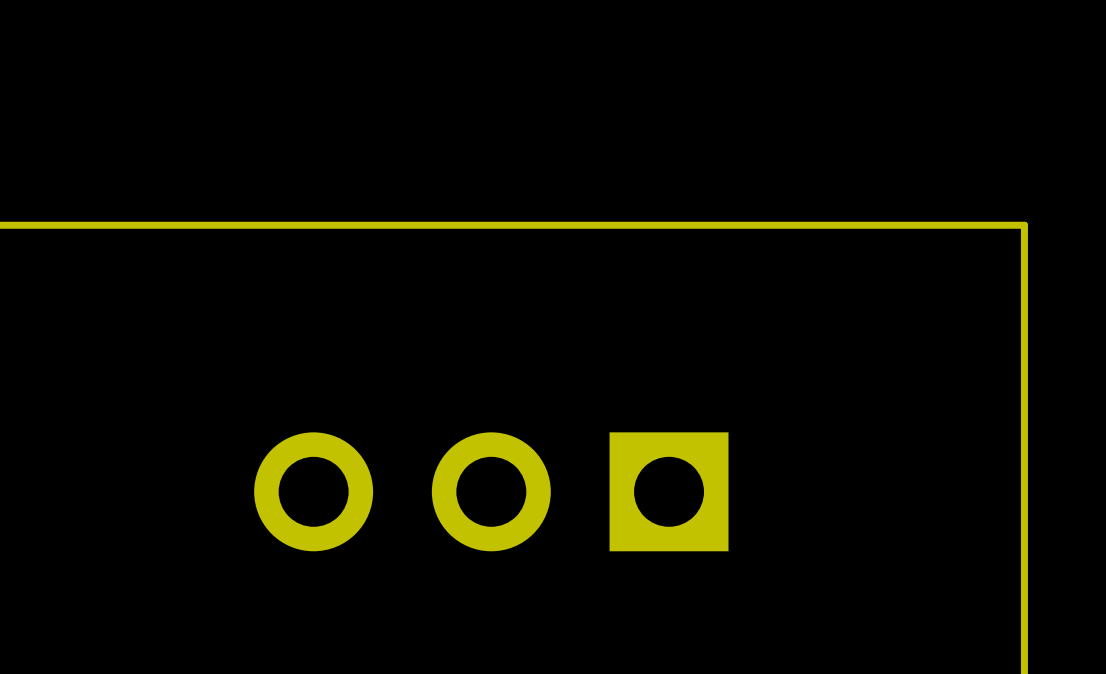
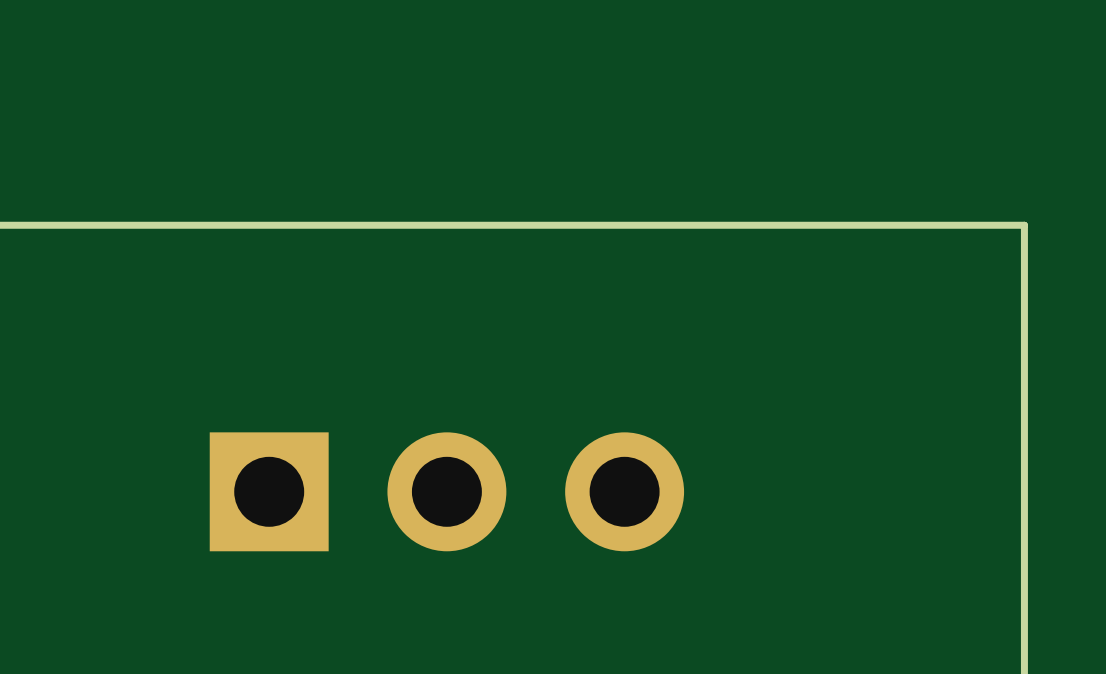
part rotation: 0° (491, 491) -> 180° (446, 491)

